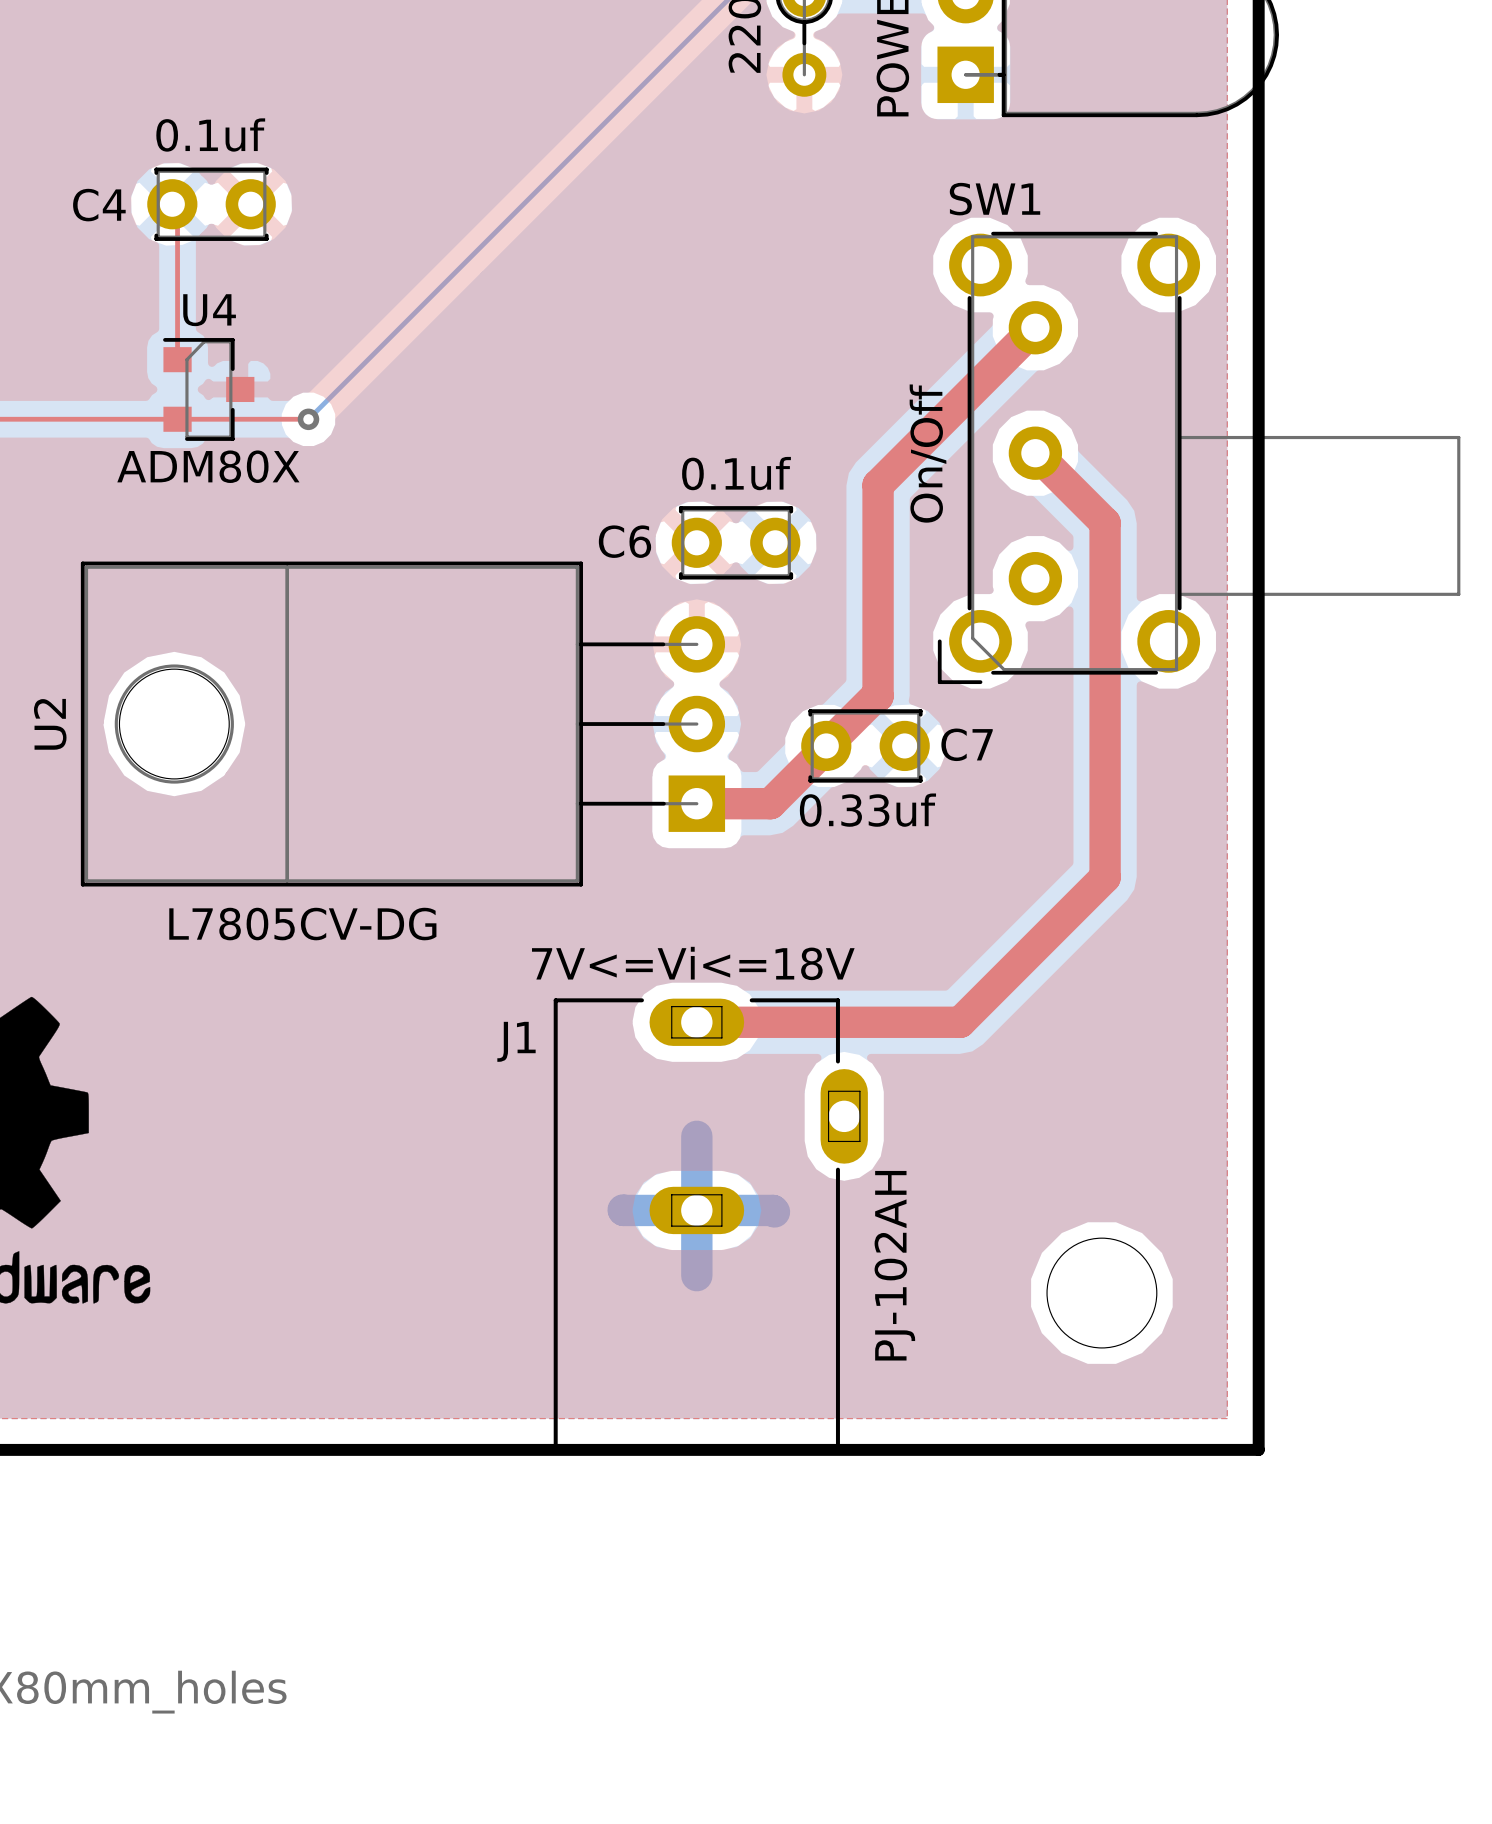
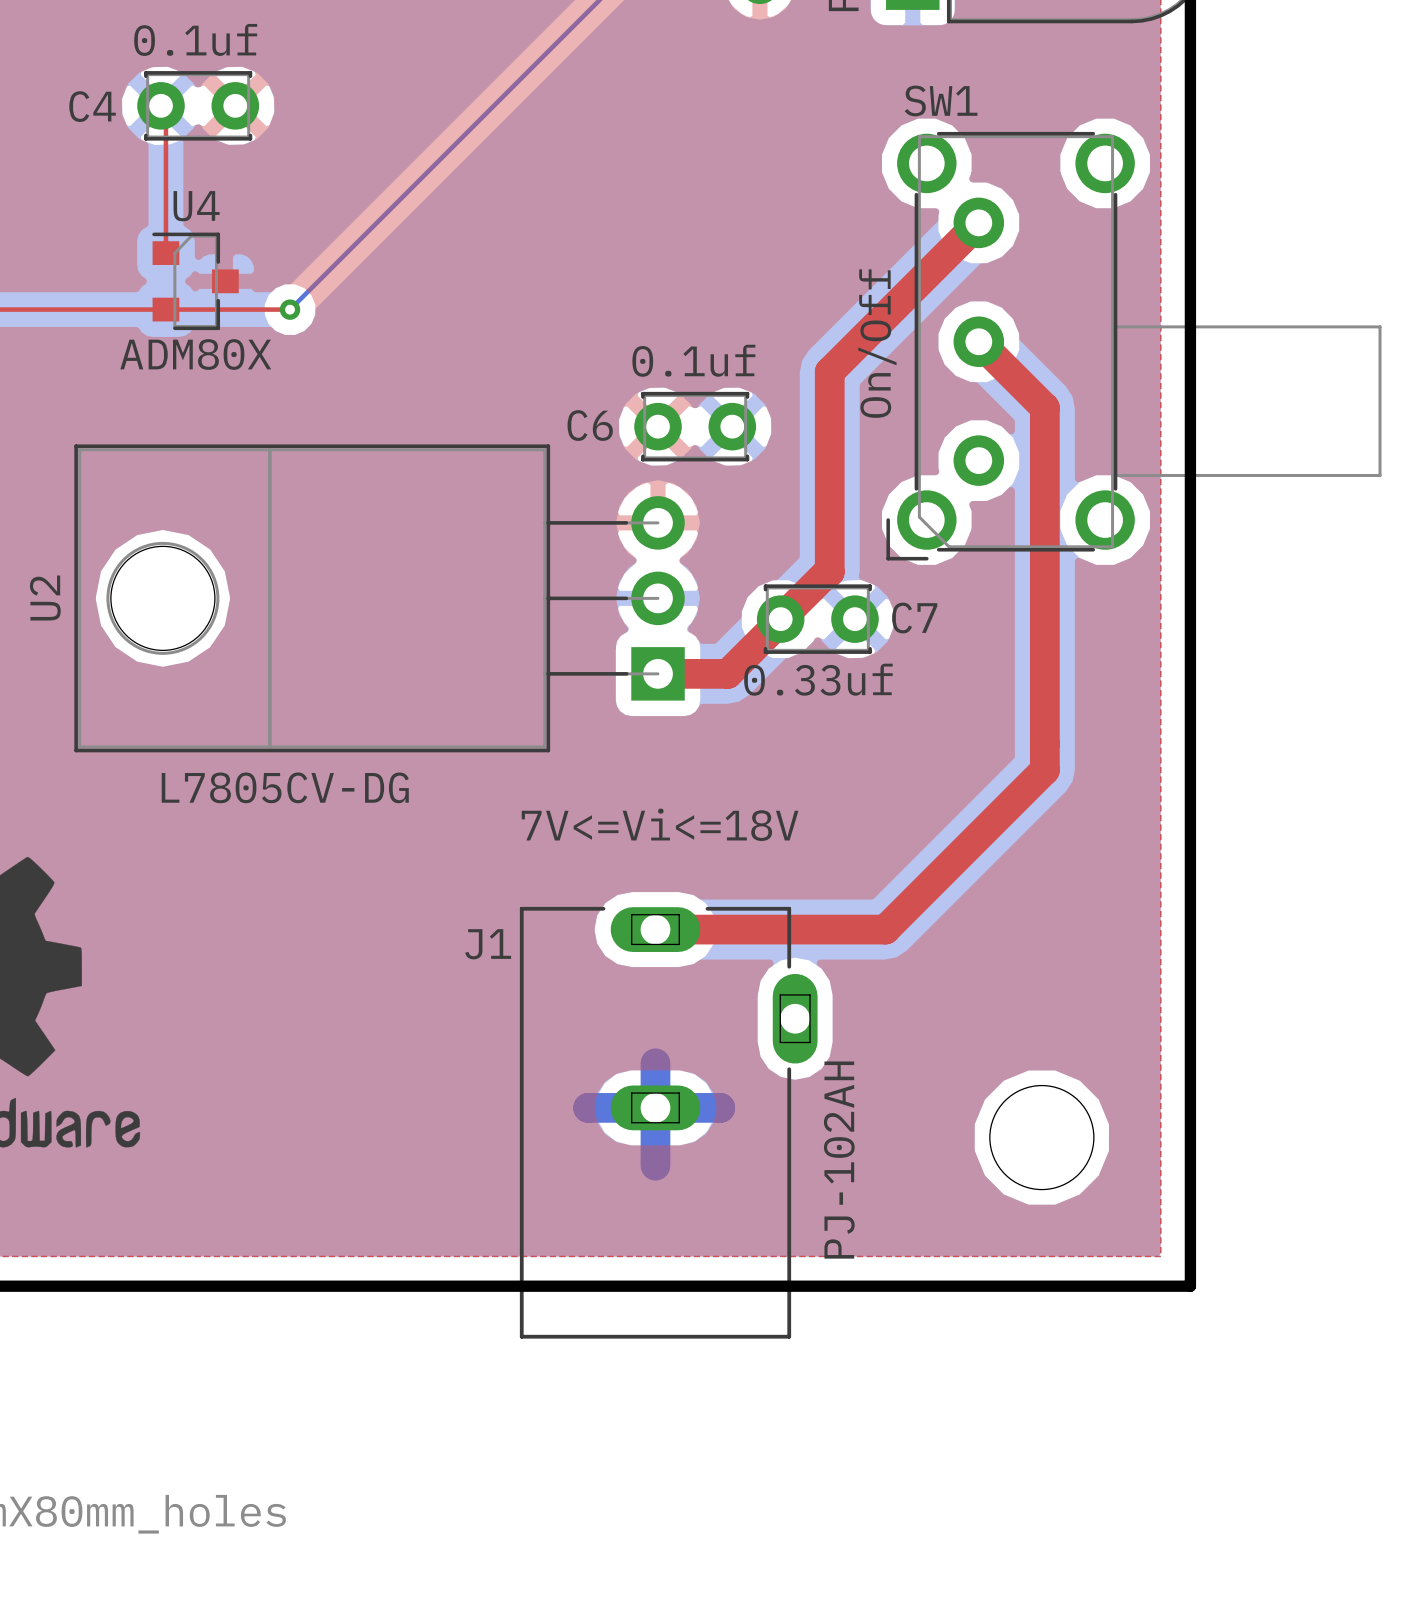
top track: (1105, 877) (960, 1022) (696, 1022) -> (1044, 743) (1044, 770) (885, 929) (655, 929)
bottom track: (696, 1136) (696, 1275) -> none
bottom track: (623, 1209) (774, 1211) -> none
bottom track: none -> (655, 1063) (655, 1165)
J1 position: (710, 1226) -> (668, 1122)
bottom track: none -> (588, 1107) (720, 1107)

